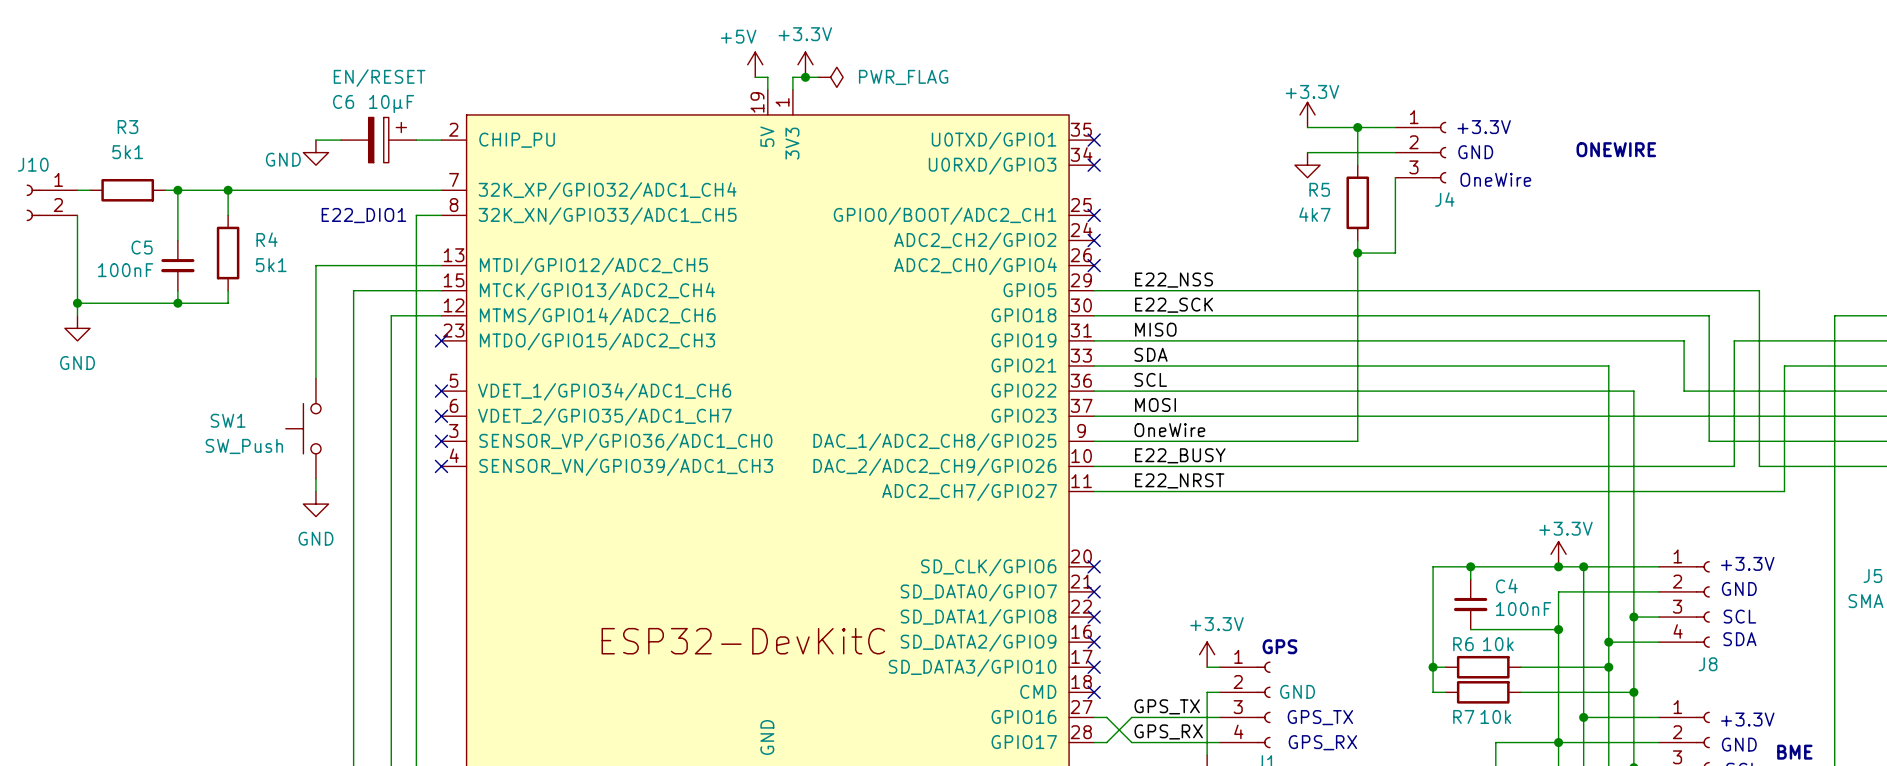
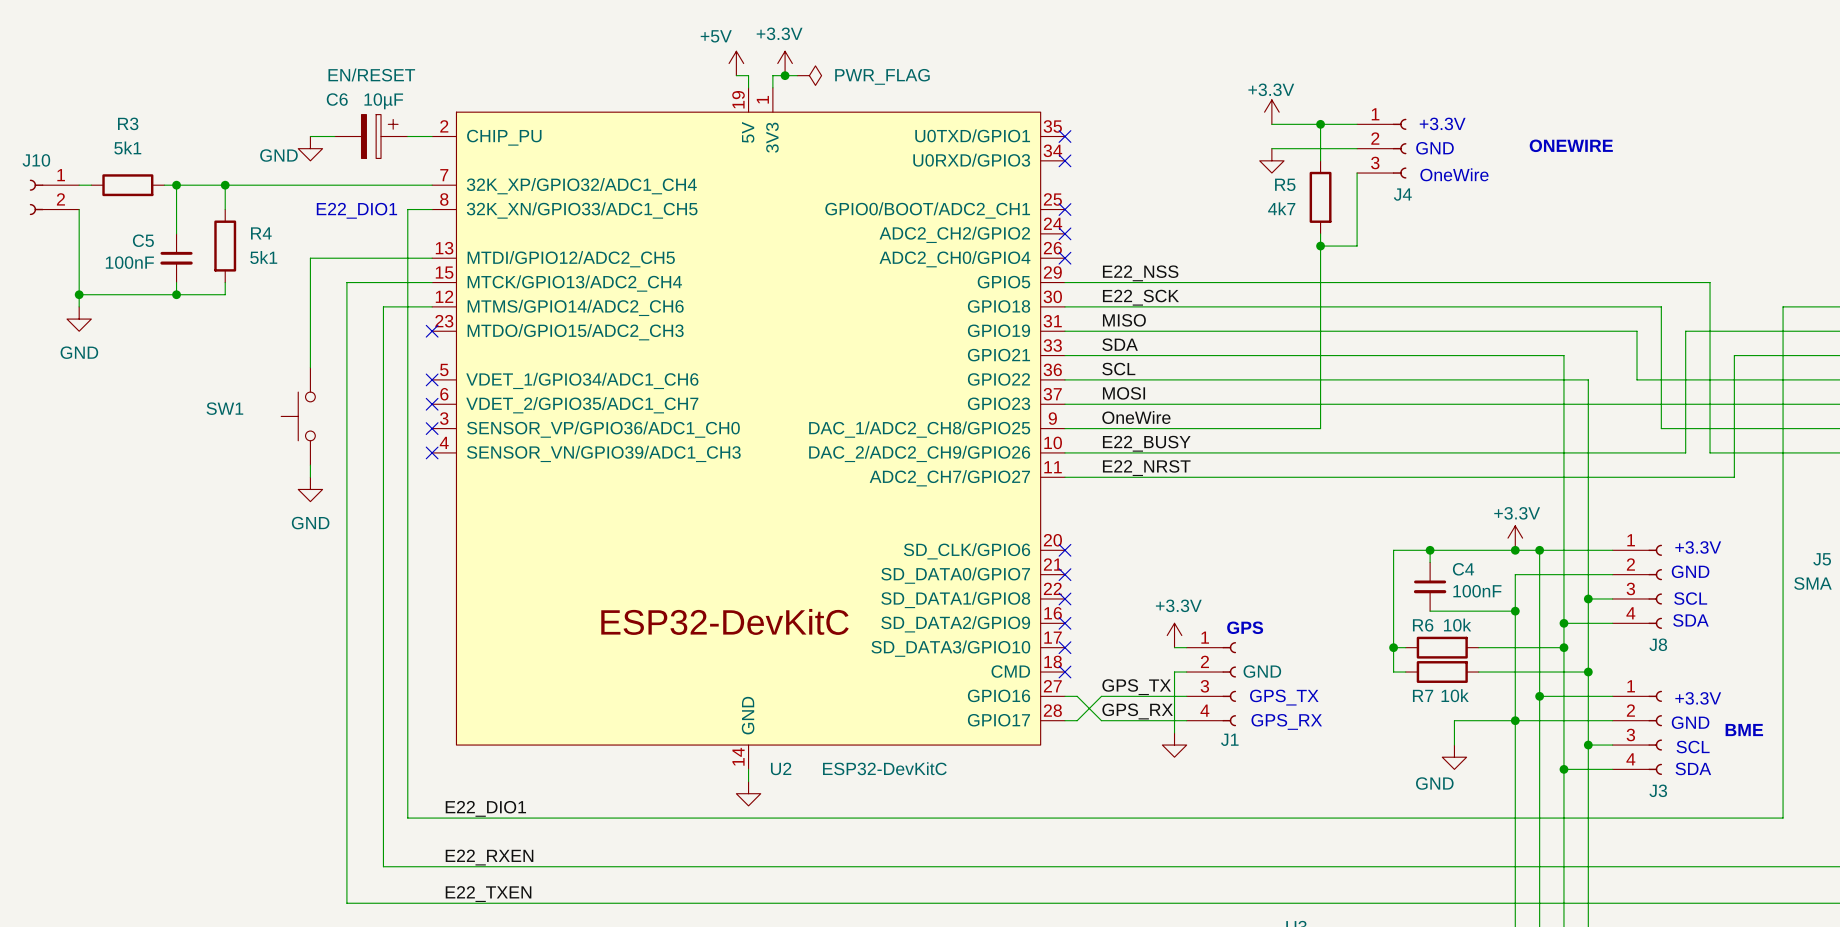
SW1 value: SW_Push (244, 446) -> none

